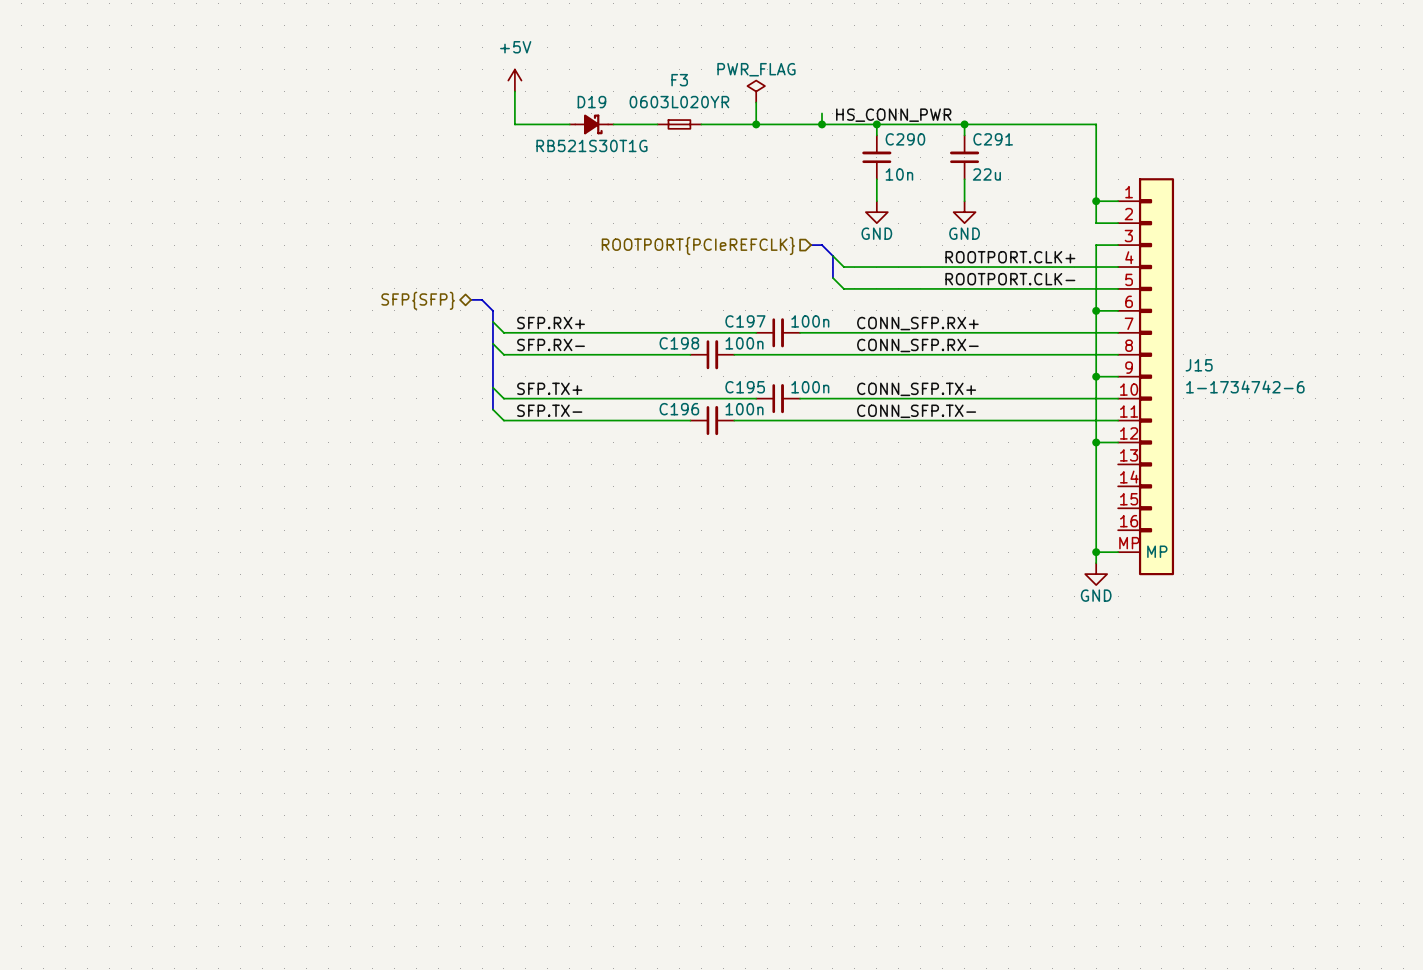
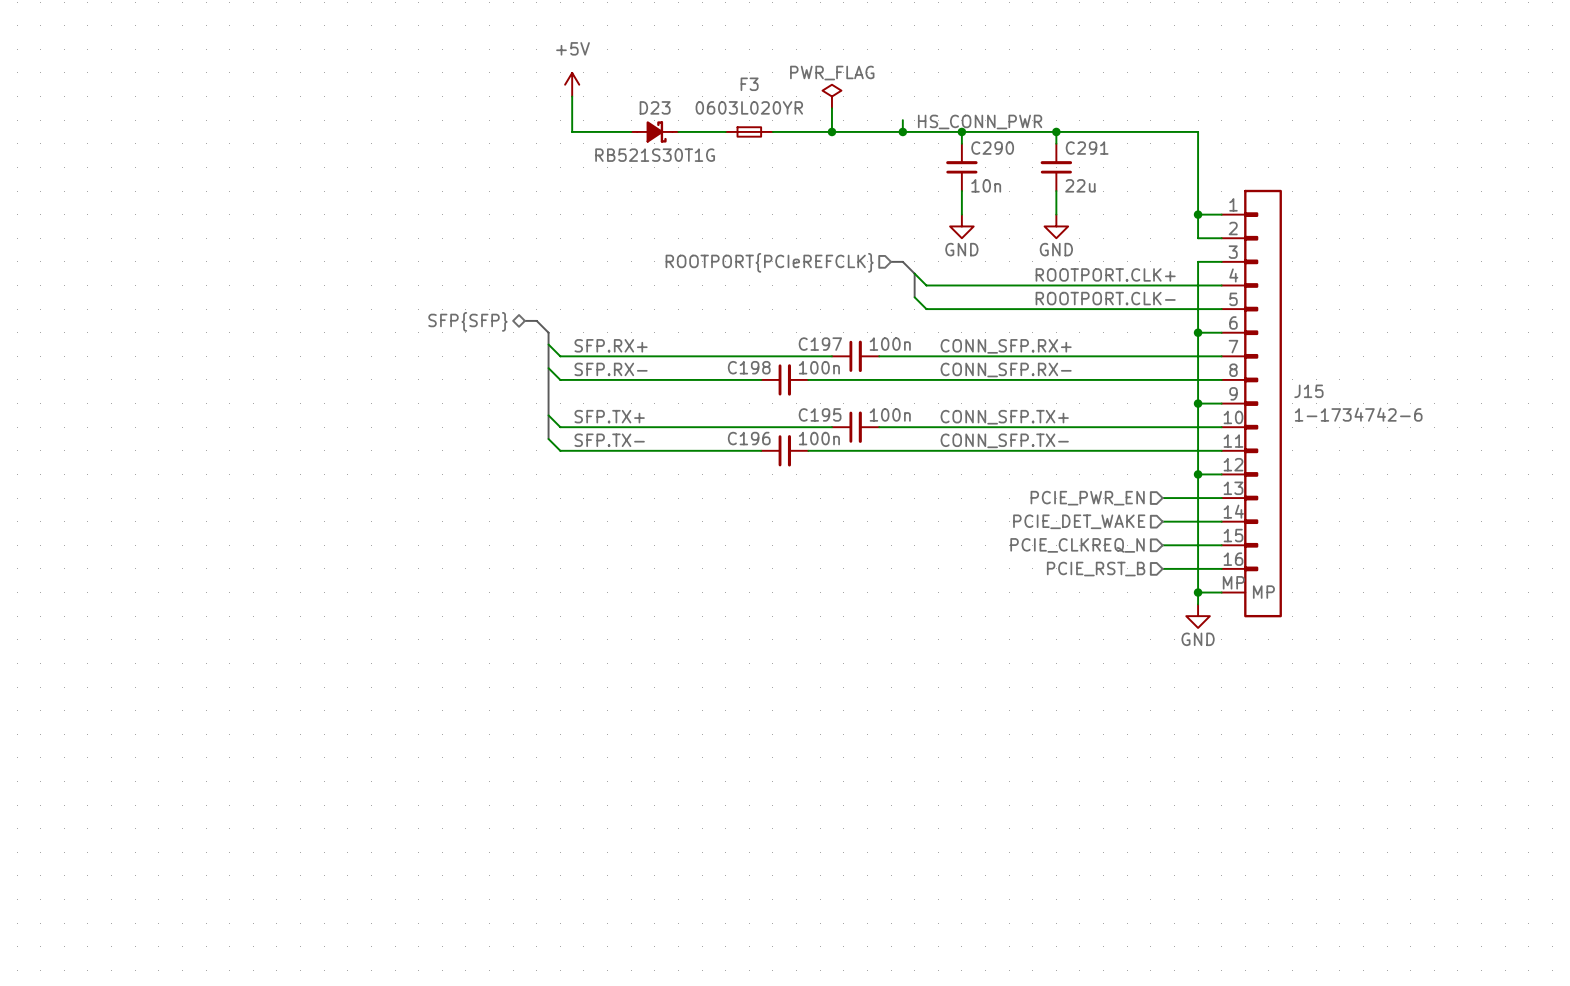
D19 name: D19 (591, 102) -> D23 (655, 107)
hierarchical label: none -> PCIE_PWR_EN (1087, 498)
wire: none -> (1162, 498) (1221, 498)
hierarchical label: none -> PCIE_DET_WAKE (1079, 521)
wire: none -> (1162, 521) (1221, 521)
hierarchical label: none -> PCIE_CLKREQ_N (1077, 545)
wire: none -> (1162, 545) (1221, 545)
hierarchical label: none -> PCIE_RST_B (1096, 569)
wire: none -> (1162, 568) (1221, 568)

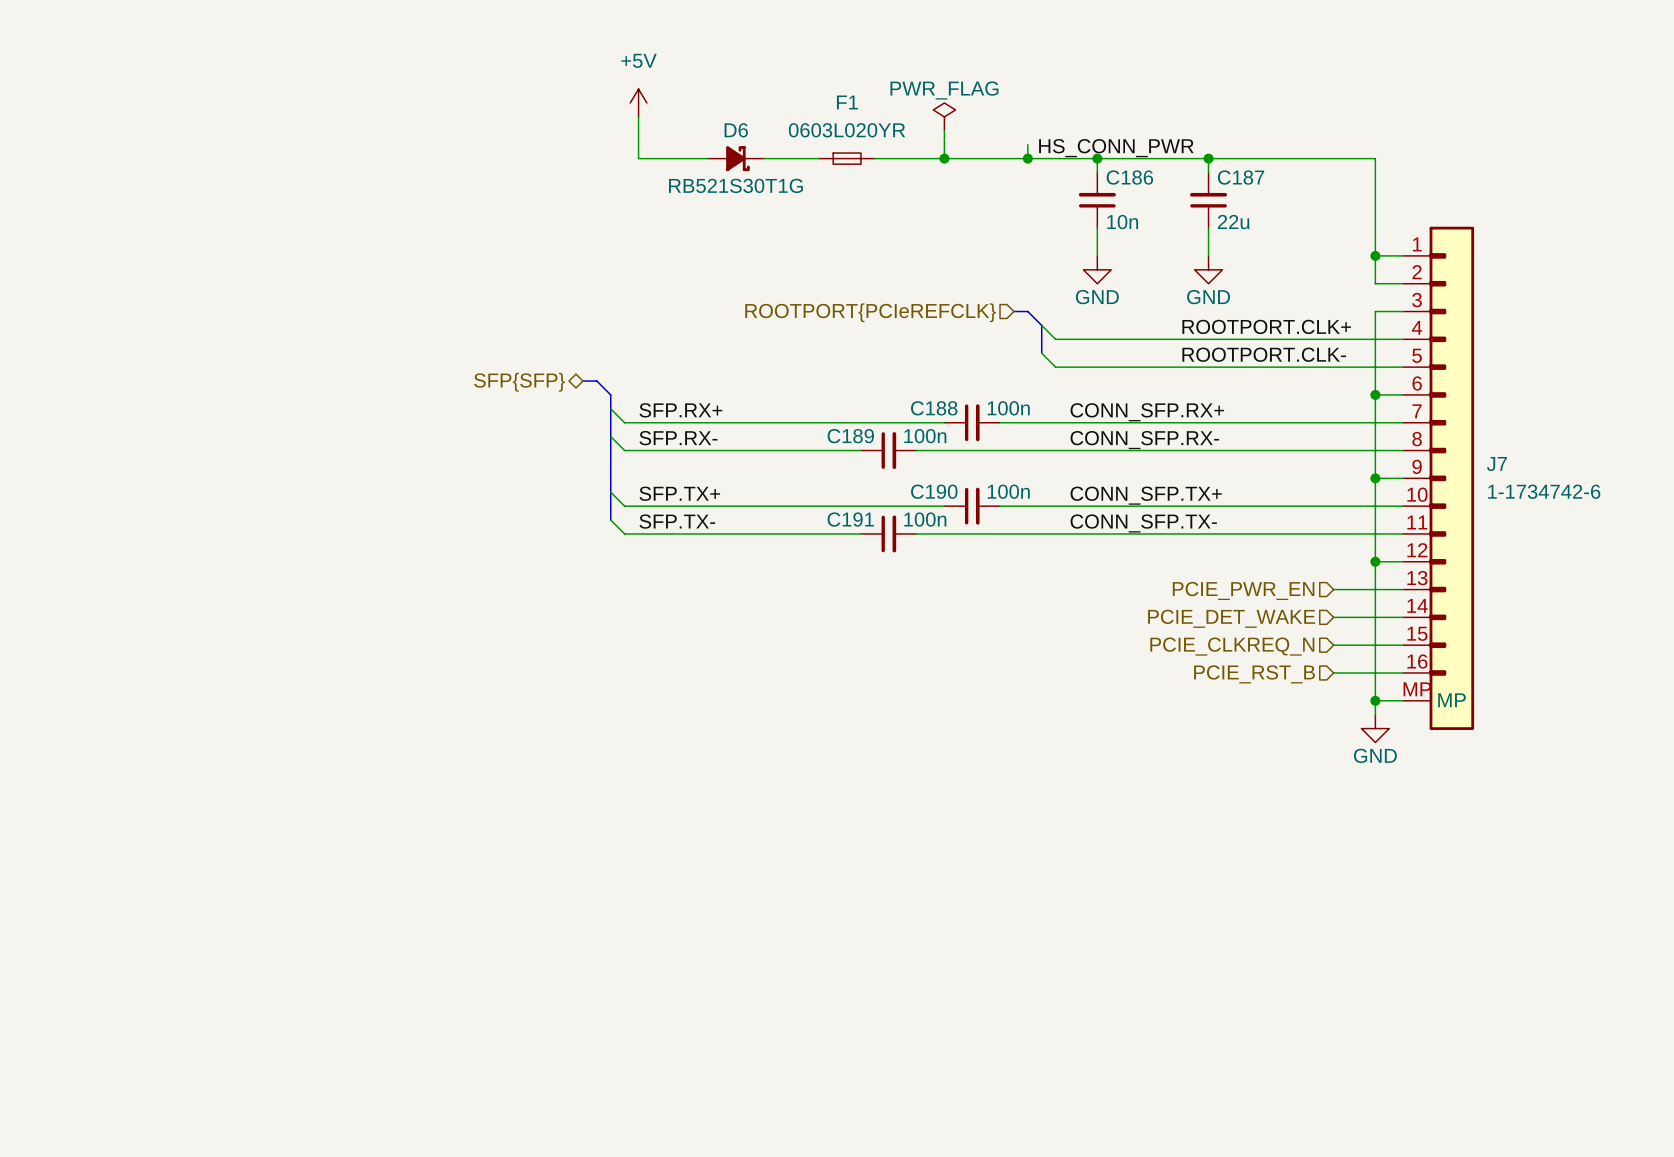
F3 name: F3 (749, 84) -> F1 (847, 102)
D23 name: D23 (655, 107) -> D6 (736, 130)
C290 name: C290 (992, 148) -> C186 (1129, 177)
C291 name: C291 (1087, 148) -> C187 (1241, 177)
C197 name: C197 (820, 344) -> C188 (934, 408)
C198 name: C198 (749, 367) -> C189 (850, 436)
J15 name: J15 (1308, 391) -> J7 (1496, 464)
C195 name: C195 (820, 414) -> C190 (934, 491)
C196 name: C196 (749, 438) -> C191 (850, 519)

